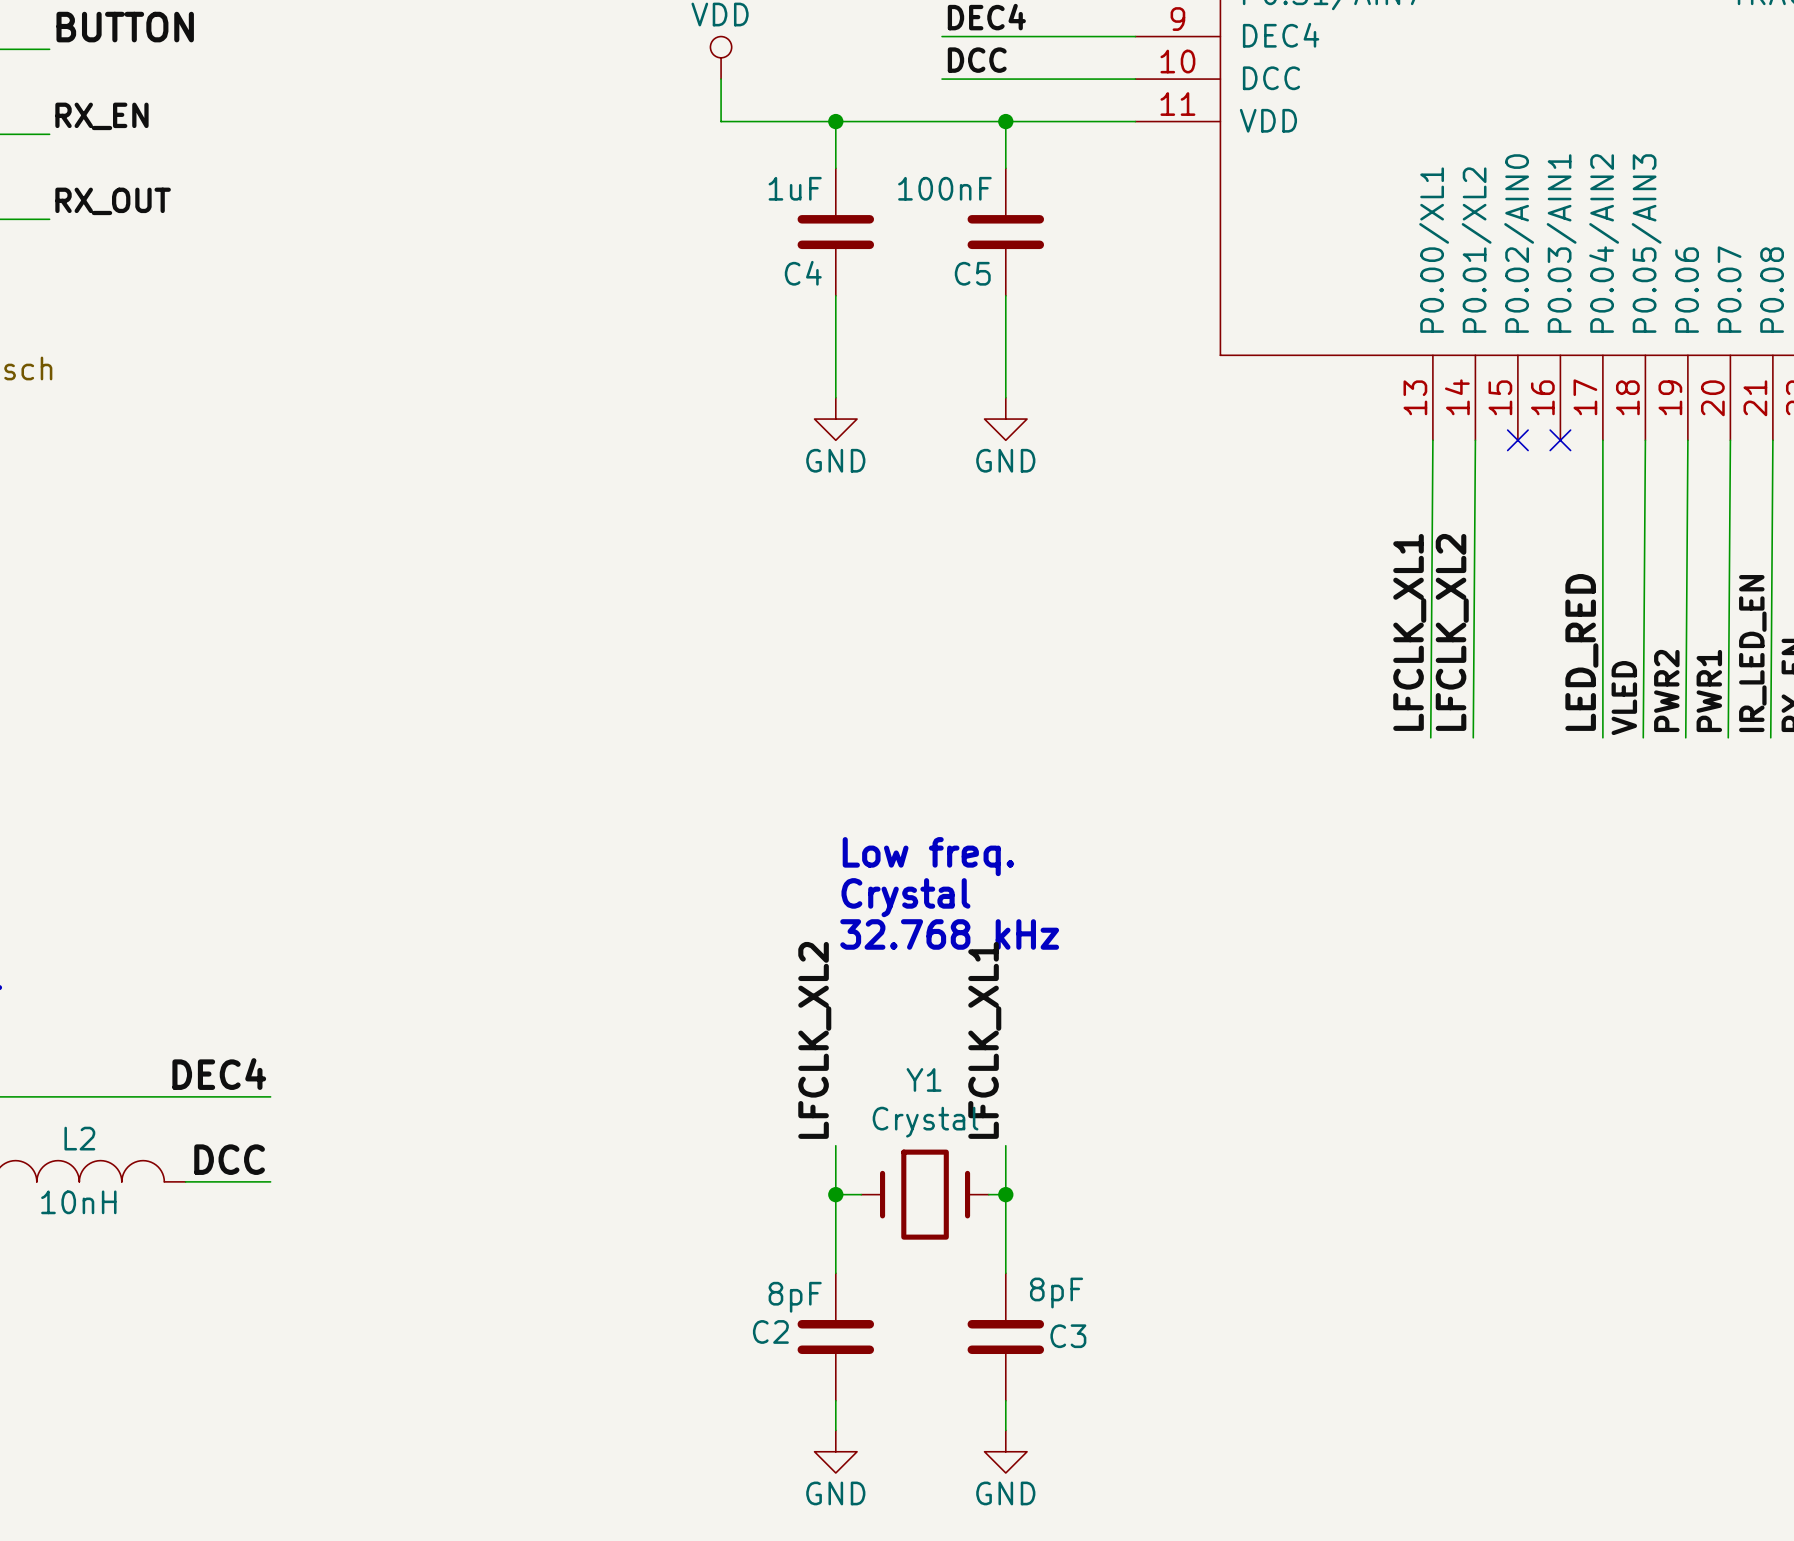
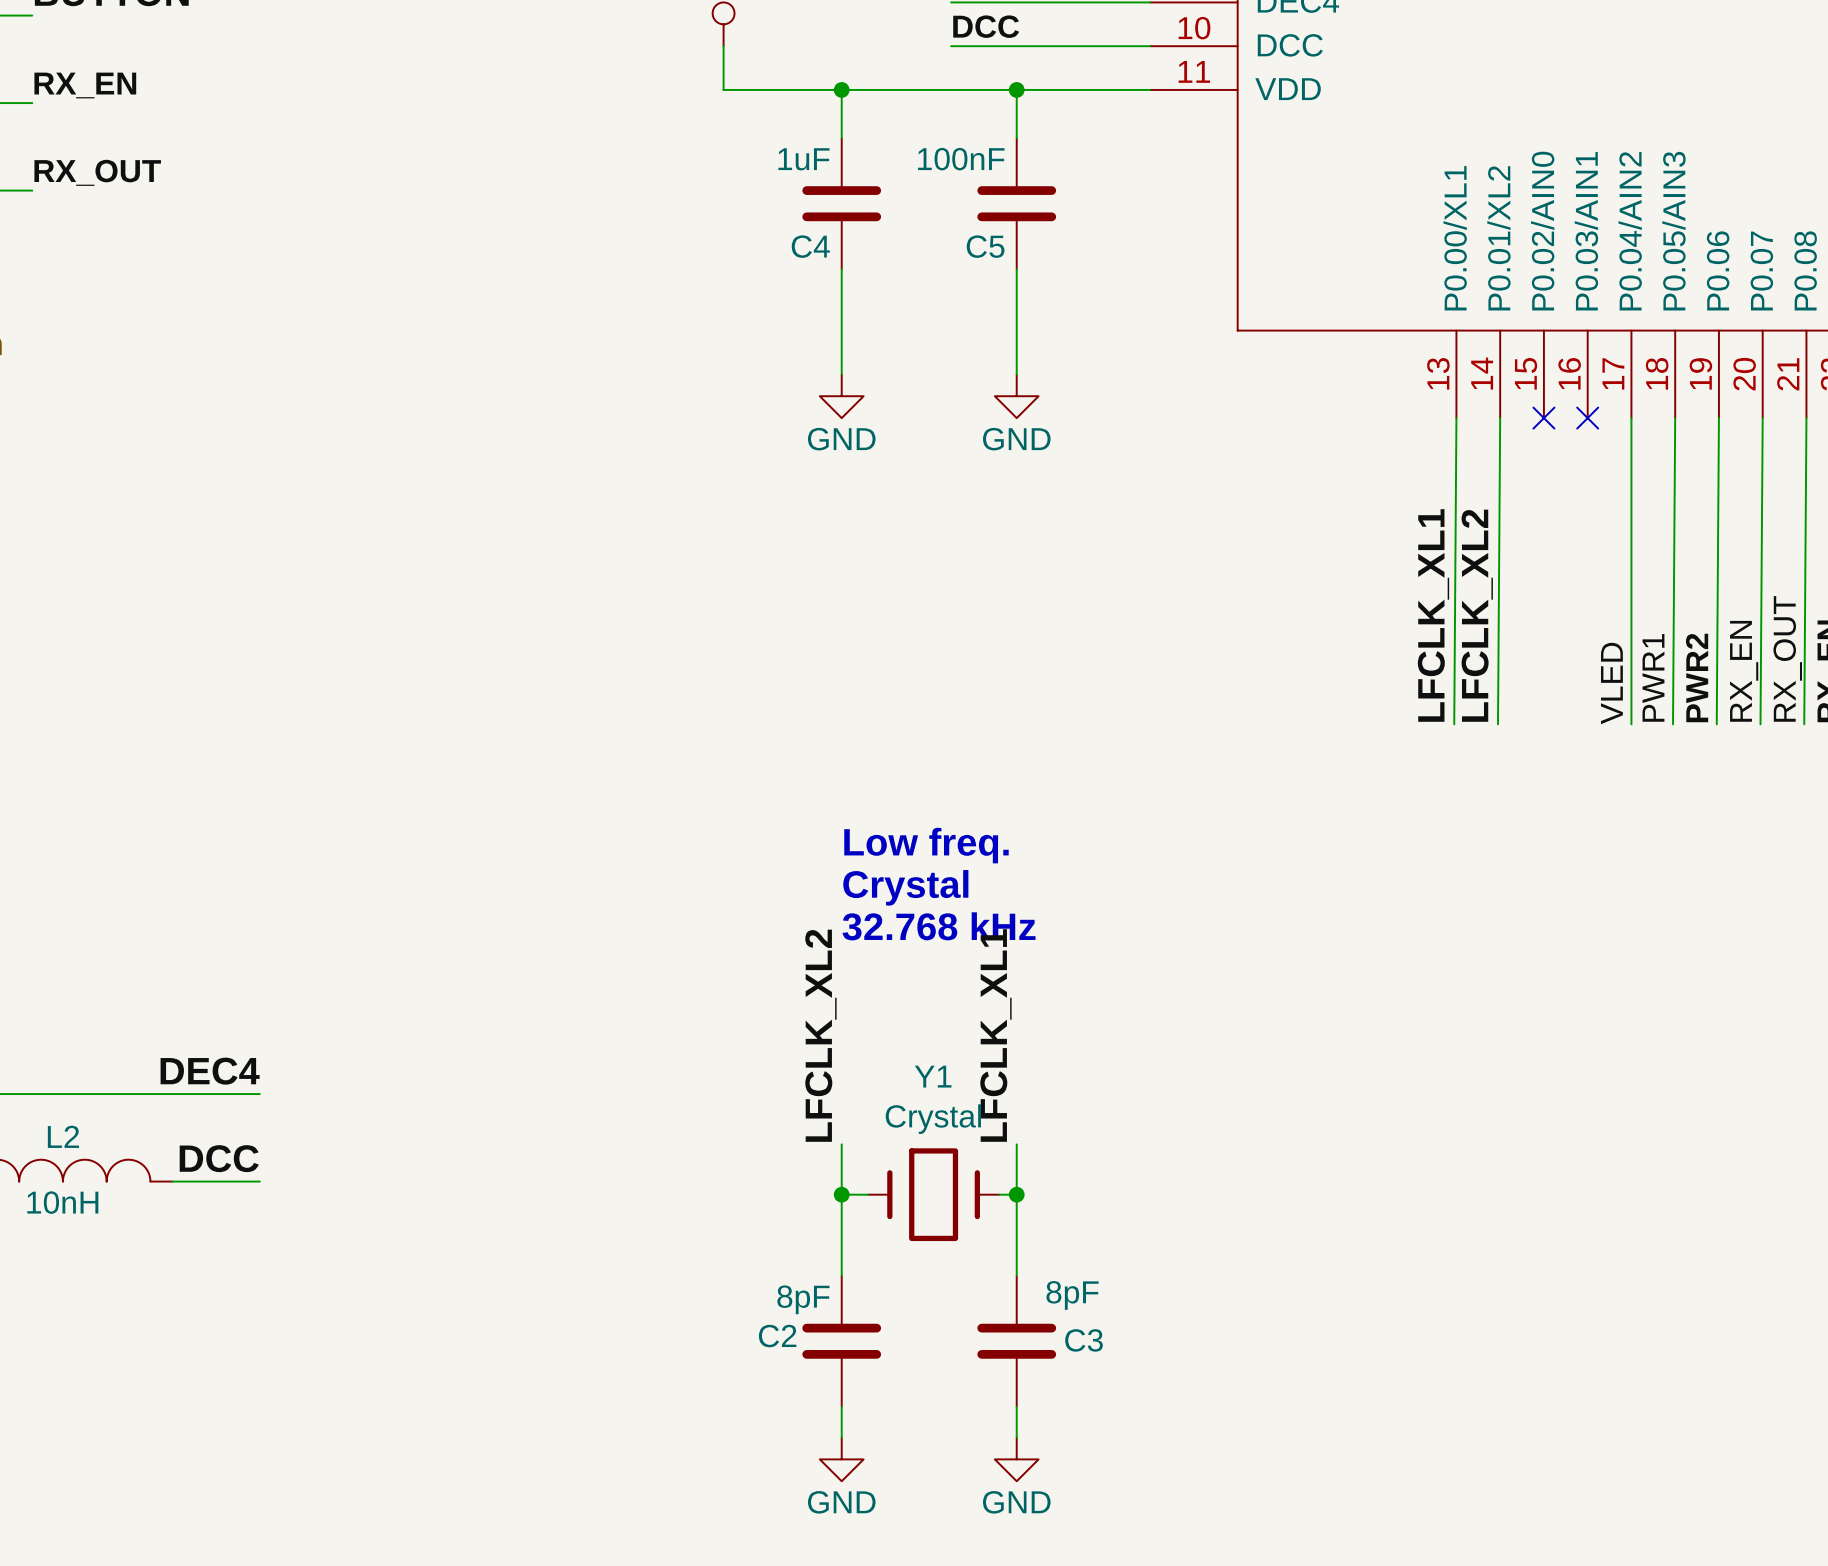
label: LED_RED (1581, 652) -> VLED (1611, 683)
label: IR_LED_EN (1752, 653) -> RX_OUT (1787, 658)
label: PWR1 (1709, 690) -> RX_EN (1744, 671)
label: VLED (1624, 698) -> PWR1 (1653, 677)

